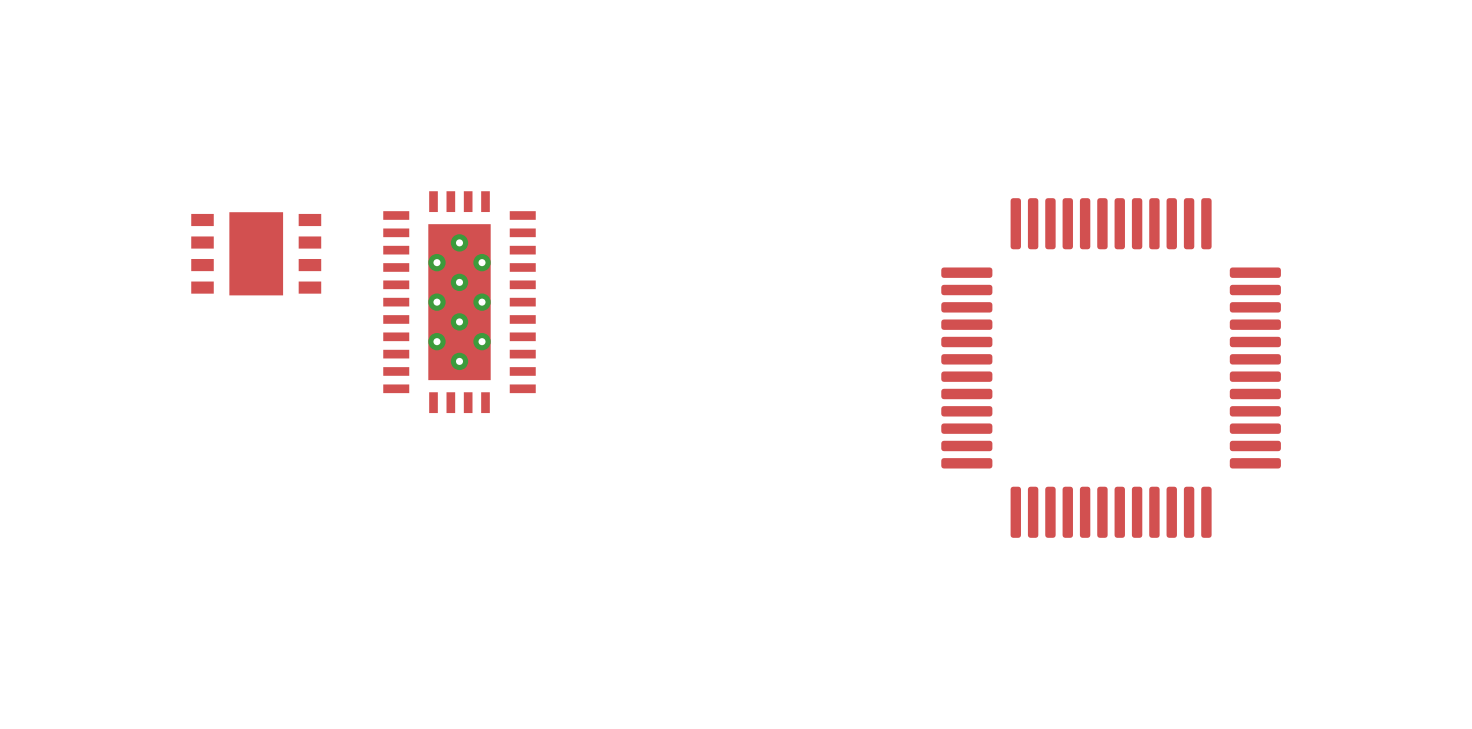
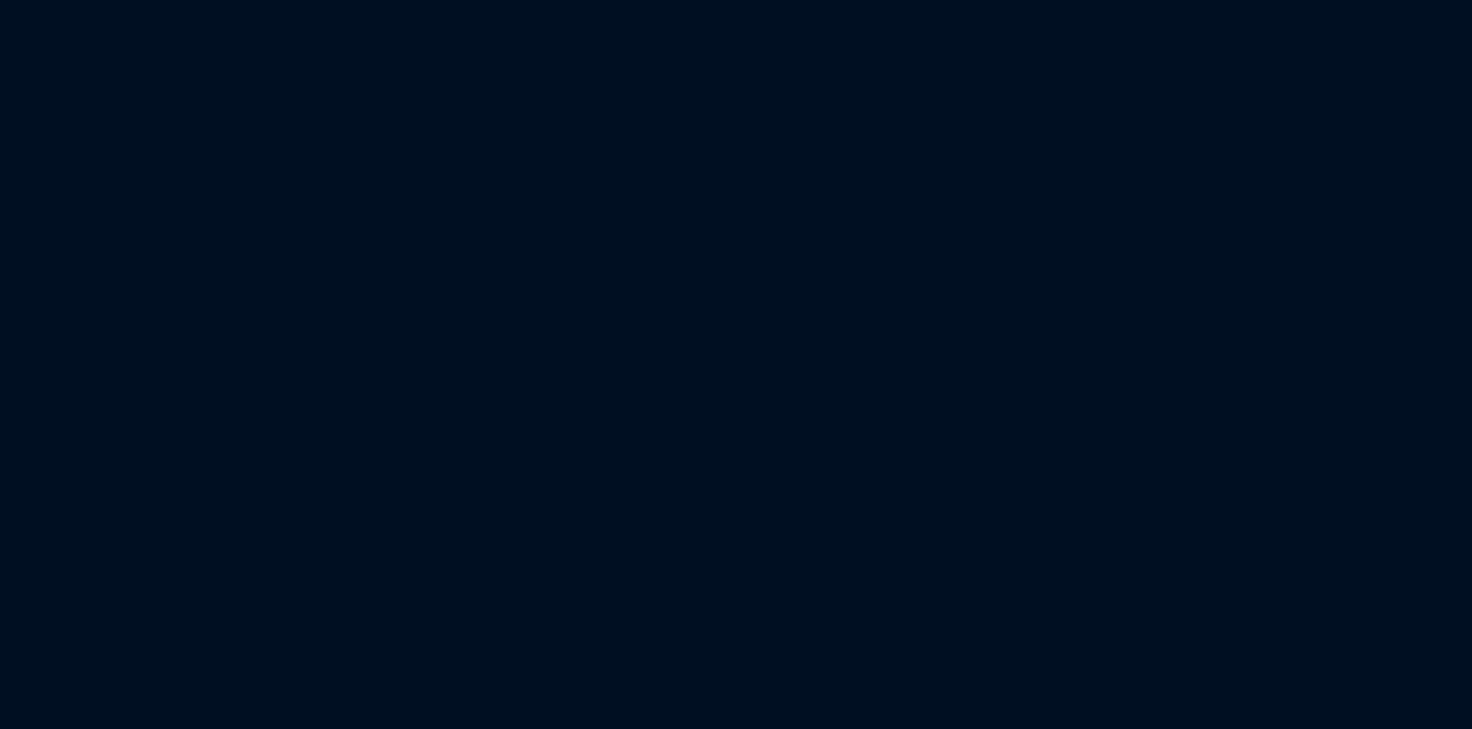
part: (256, 253) -> none
part: (459, 302) -> none
part: (1111, 368) -> none

